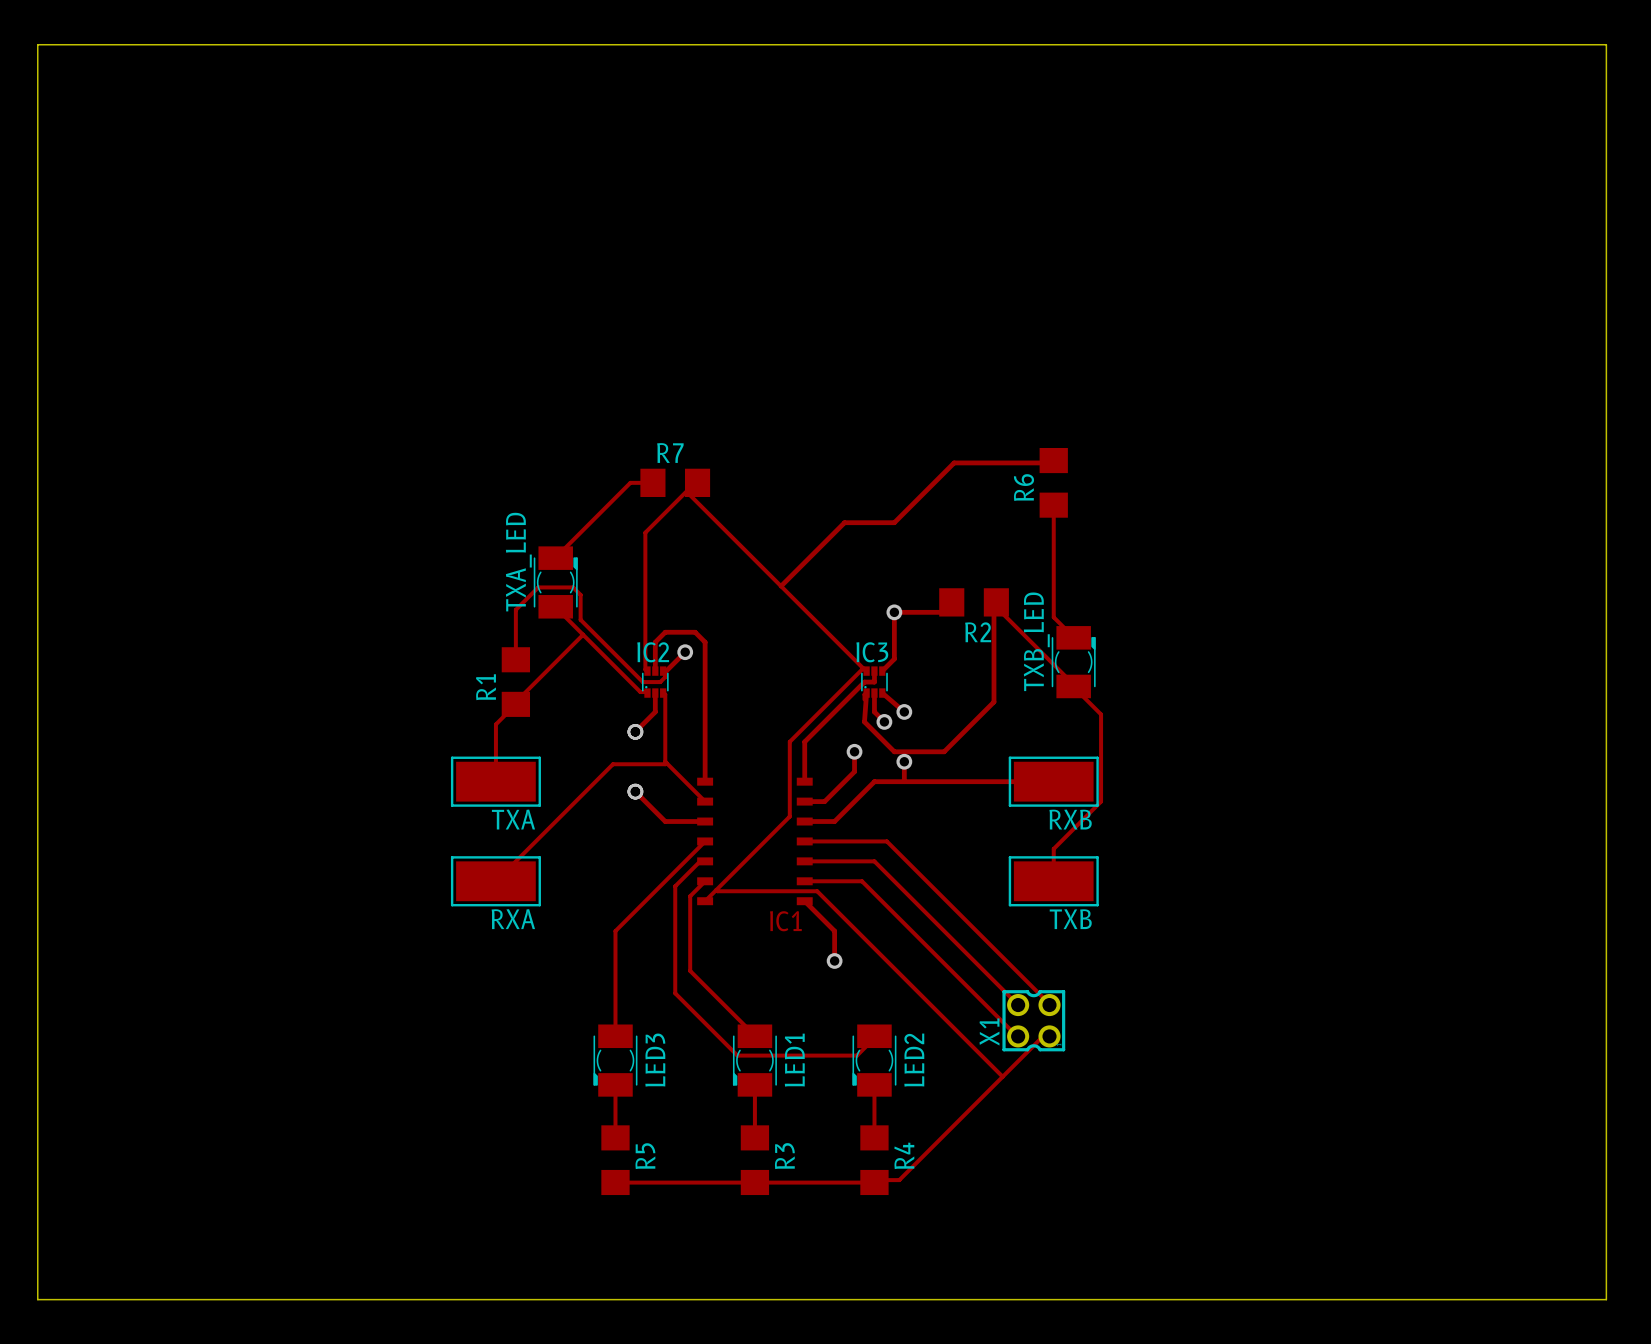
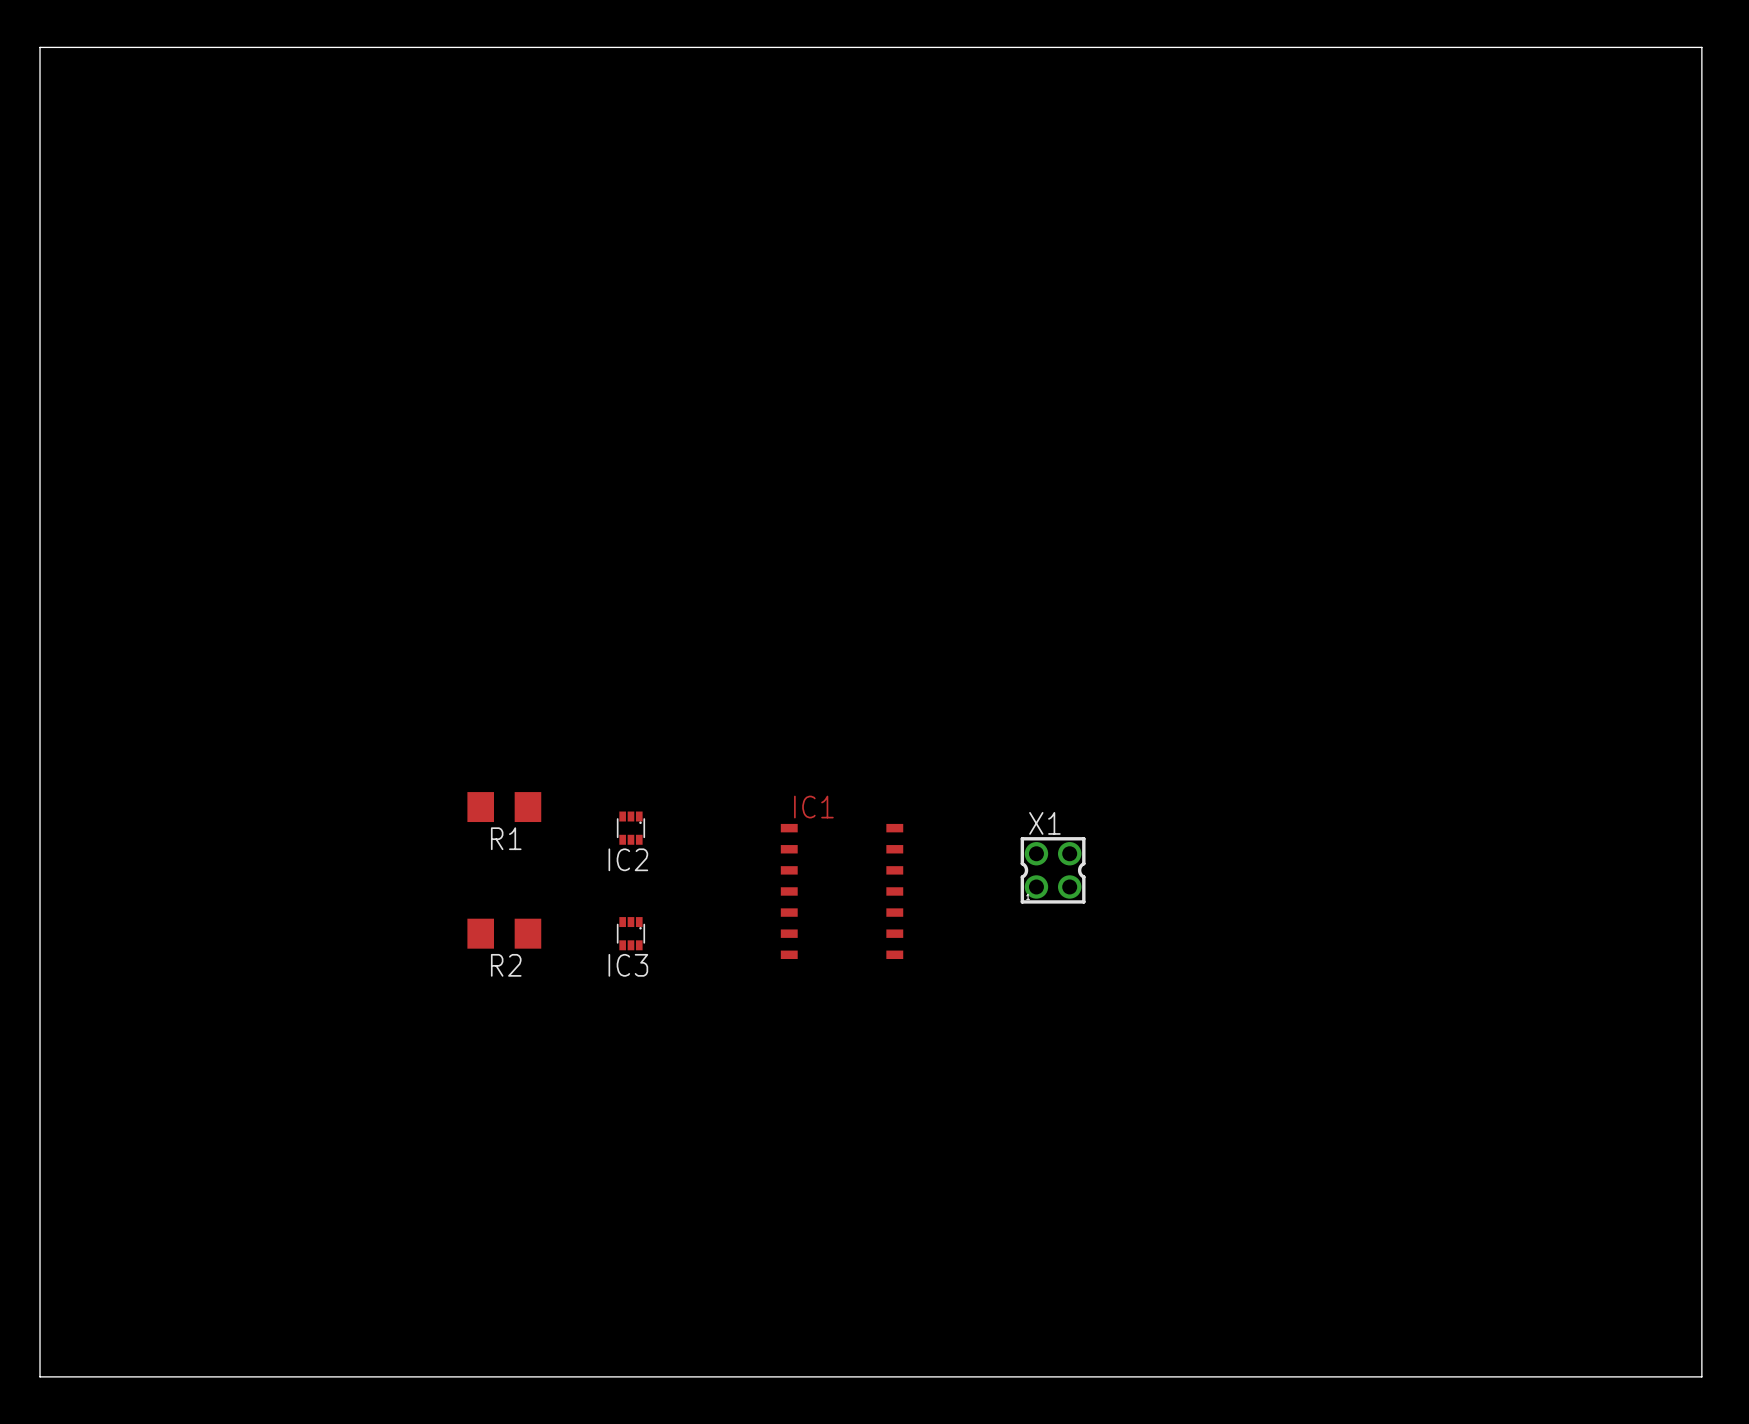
track: (1053, 460) (1053, 462) (954, 462) (894, 522) (844, 522) (781, 586) -> none
track: (652, 482) (630, 482) (555, 558) -> none
R7: (675, 482) -> none
R6: (1053, 482) -> none
track: (1053, 505) (1053, 617) (1073, 637) -> none
TXA_LED: (555, 582) -> none
track: (951, 602) (944, 612) (894, 612) (894, 659) (882, 671) -> none
R2 position: (974, 602) -> (504, 933)
track: (555, 606) (640, 692) (647, 693) -> none
via: (894, 612) -> none
track: (583, 634) (495, 724) (495, 781) -> none
track: (685, 652) (665, 672) -> none
via: (685, 652) -> none
track: (515, 659) (515, 609) (538, 587) (573, 587) (580, 594) (580, 619) (642, 682) (660, 682) (665, 677) (665, 672) -> none
TXB_LED: (1073, 662) -> none
track: (863, 668) (789, 741) (789, 816) (705, 901) -> none
track: (647, 671) (645, 669) (645, 532) (695, 482) (697, 482) (687, 492) (866, 671) -> none
track: (655, 671) (655, 642) (665, 632) (695, 632) (705, 642) (705, 781) -> none
track: (874, 671) (874, 682) (864, 682) (804, 741) (804, 781) -> none
R1 rotation: 0° (515, 682) -> 90° clockwise (504, 807)
R1 position: (515, 682) -> (504, 807)
IC2 rotation: 0° (655, 682) -> 180° (630, 828)
IC2 position: (655, 682) -> (630, 828)
IC3 rotation: 0° (874, 682) -> 180° (630, 933)
IC3 position: (874, 682) -> (630, 933)
R1 name position: R1 (485, 687) -> R1 (506, 838)
track: (655, 693) (655, 711) (635, 731) -> none
track: (663, 693) (665, 694) (665, 761) (705, 801) -> none
track: (874, 693) (874, 711) (884, 721) -> none
track: (882, 693) (904, 711) -> none
track: (864, 699) (864, 694) (866, 693) (864, 721) (894, 751) (944, 751) (993, 701) (993, 602) (996, 602) (993, 604) (1073, 684) (1073, 687) (1101, 714) (1101, 801) (1053, 848) (1053, 881) -> none
via: (904, 711) -> none
via: (884, 721) -> none
via: (635, 731) -> none
track: (854, 751) (854, 771) (824, 801) (804, 801) -> none
via: (854, 751) -> none
track: (904, 761) (904, 781) -> none
via: (904, 761) -> none
track: (666, 763) (612, 764) (495, 881) -> none
TXA: (495, 781) -> none
track: (1053, 781) (874, 781) (834, 821) (804, 821) -> none
RXB: (1053, 781) -> none
track: (635, 791) (665, 821) (705, 821) -> none
via: (635, 791) -> none
track: (705, 841) (615, 931) (615, 1036) -> none
IC1 position: (754, 841) -> (842, 891)
track: (804, 841) (886, 841) (1049, 1005) -> none
track: (705, 861) (700, 861) (675, 886) (675, 993) (737, 1055) (857, 1055) (874, 1036) -> none
track: (804, 861) (874, 861) (1018, 1005) -> none
RXA: (495, 881) -> none
track: (705, 881) (690, 896) (690, 970) (754, 1036) -> none
track: (804, 881) (862, 881) (1018, 1036) -> none
TXB: (1053, 881) -> none
track: (716, 890) (817, 891) (1002, 1076) -> none
track: (804, 901) (834, 931) (834, 960) -> none
IC1 name position: IC1 (785, 921) -> IC1 (813, 807)
via: (834, 960) -> none
X1 rotation: 0° (1033, 1020) -> 90° clockwise (1053, 870)
X1 position: (1033, 1020) -> (1053, 870)
track: (1049, 1036) (1048, 1038) (1041, 1038) (899, 1180) (874, 1180) (874, 1182) (615, 1182) -> none
LED3: (615, 1060) -> none
LED1: (754, 1060) -> none
LED2: (874, 1060) -> none
track: (615, 1084) (615, 1137) -> none
track: (754, 1084) (754, 1137) -> none
track: (874, 1084) (874, 1137) -> none
R5: (615, 1160) -> none
R3: (754, 1160) -> none
R4: (874, 1160) -> none

